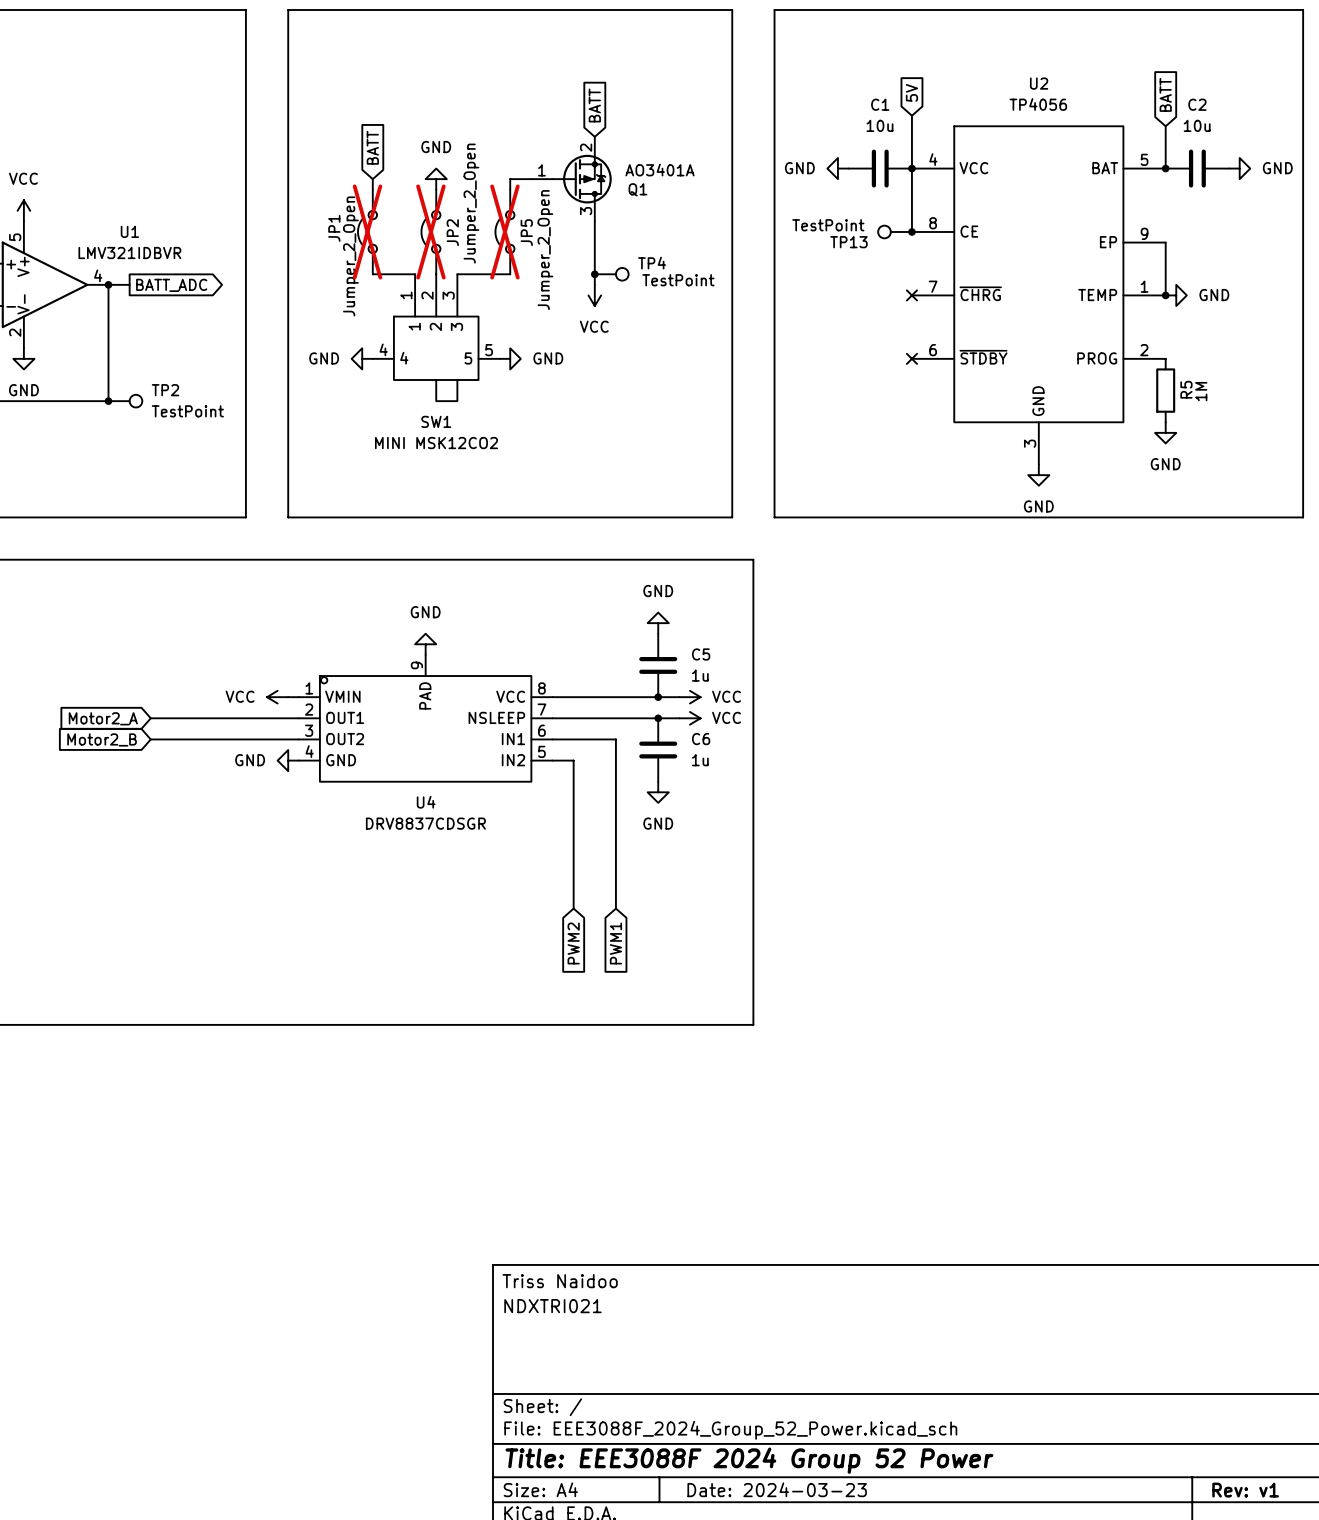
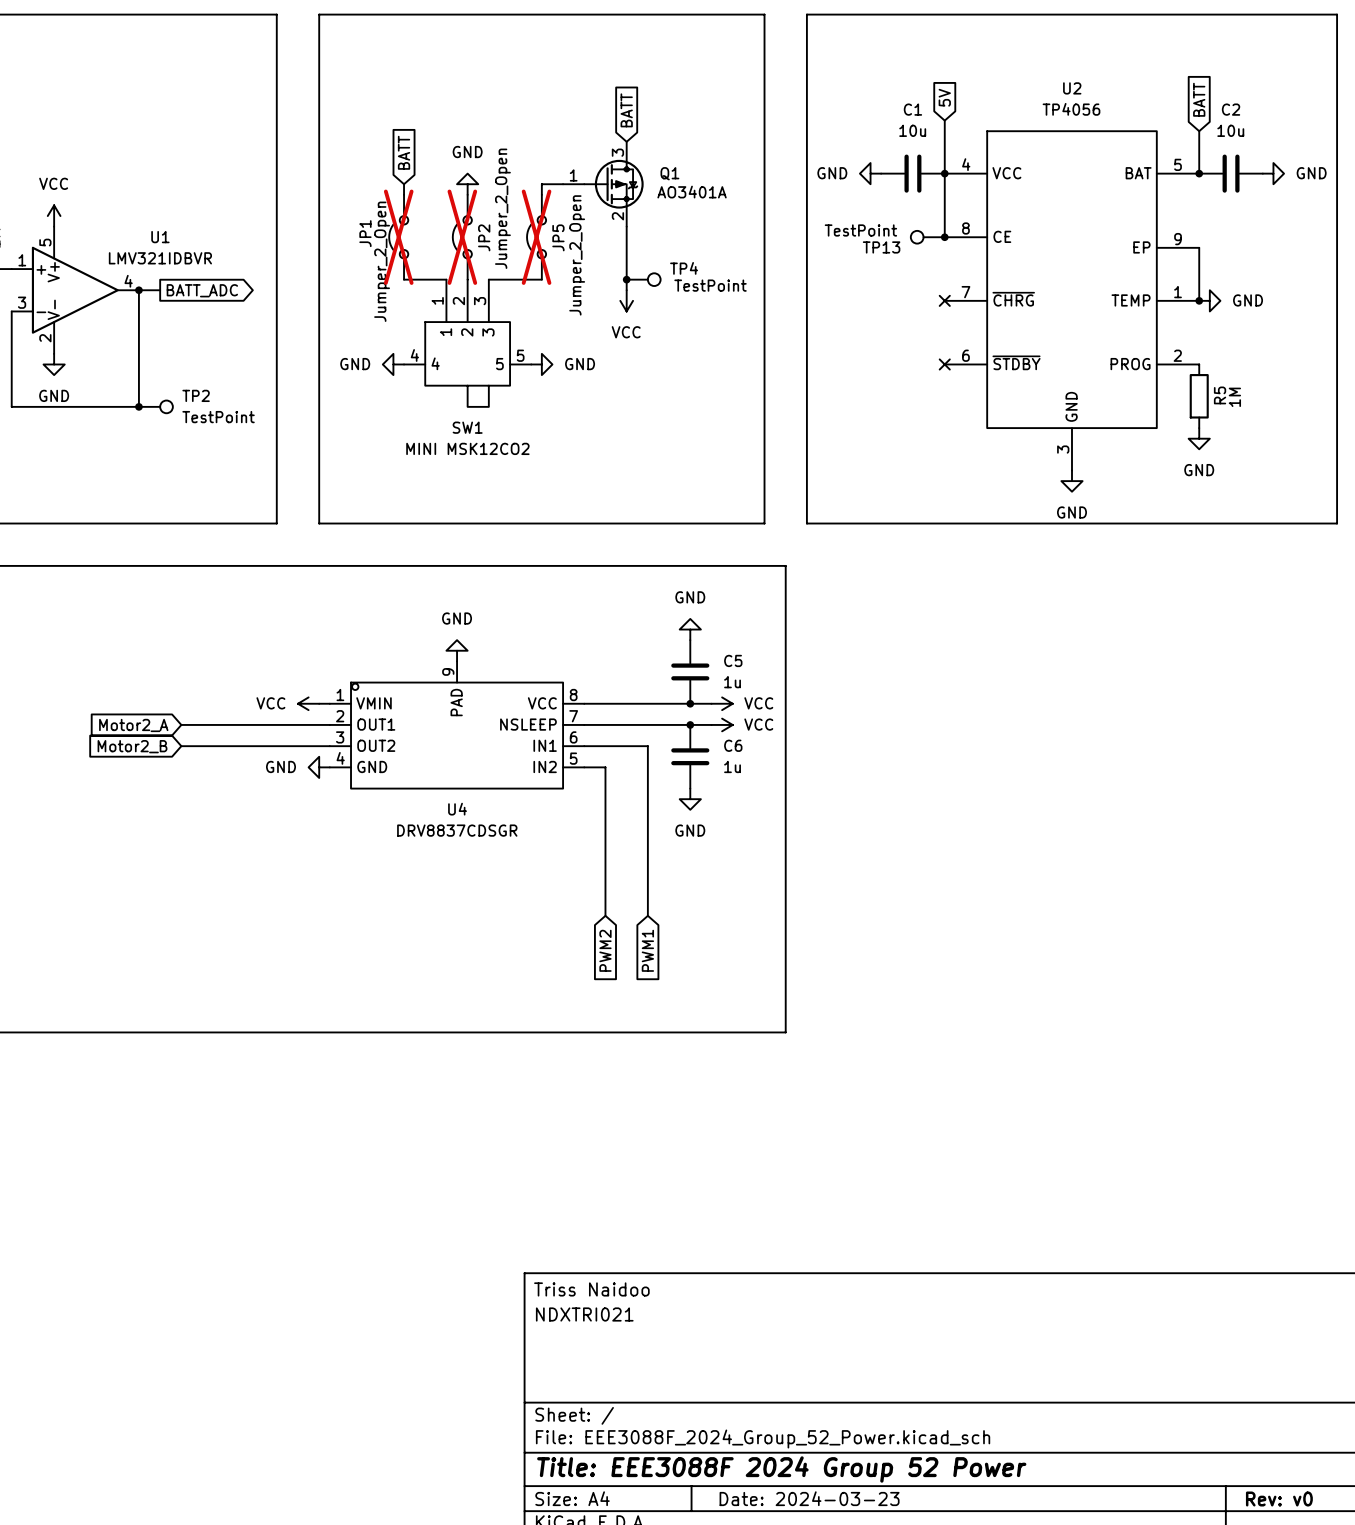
Q1 flip: as is (582, 179) -> up-down (613, 184)
title block: Rev: v1 (1245, 1490) -> Rev: v0 (1279, 1499)

